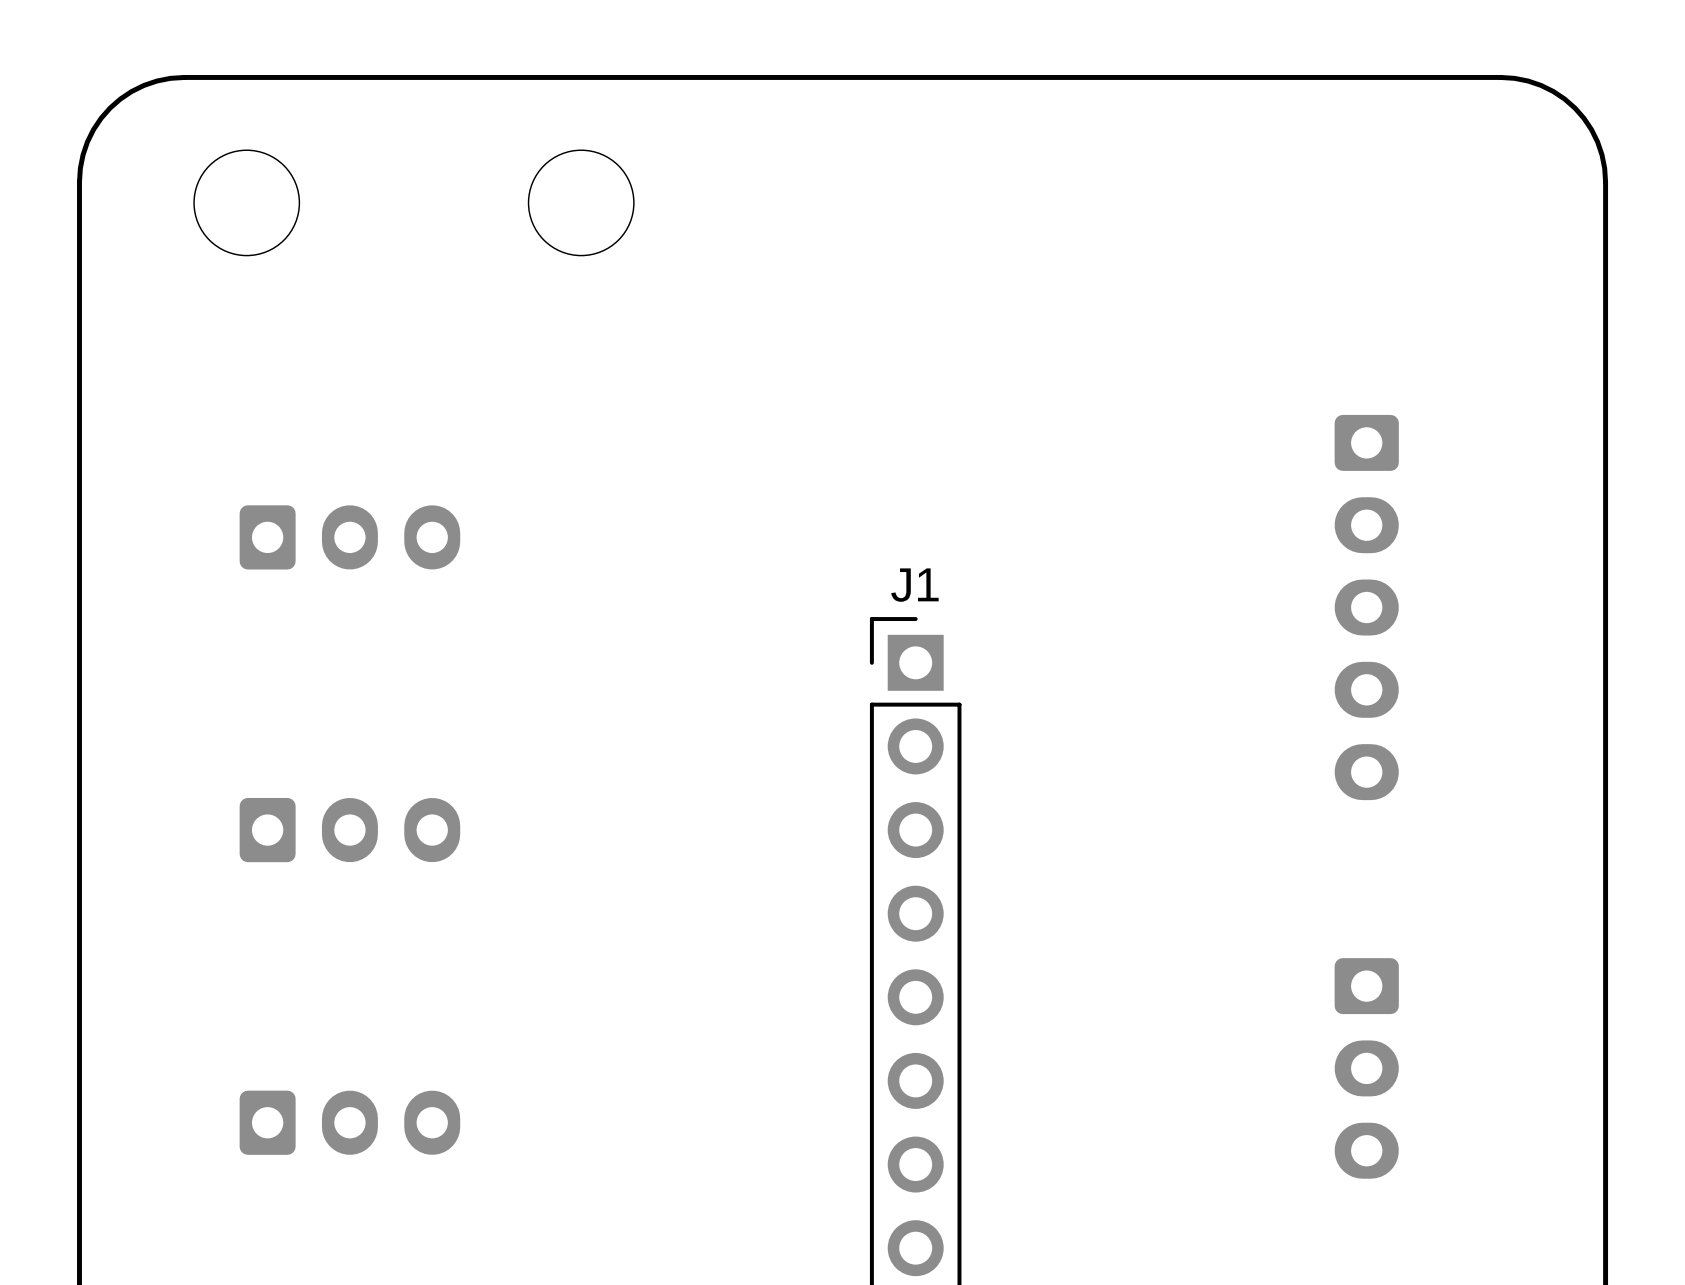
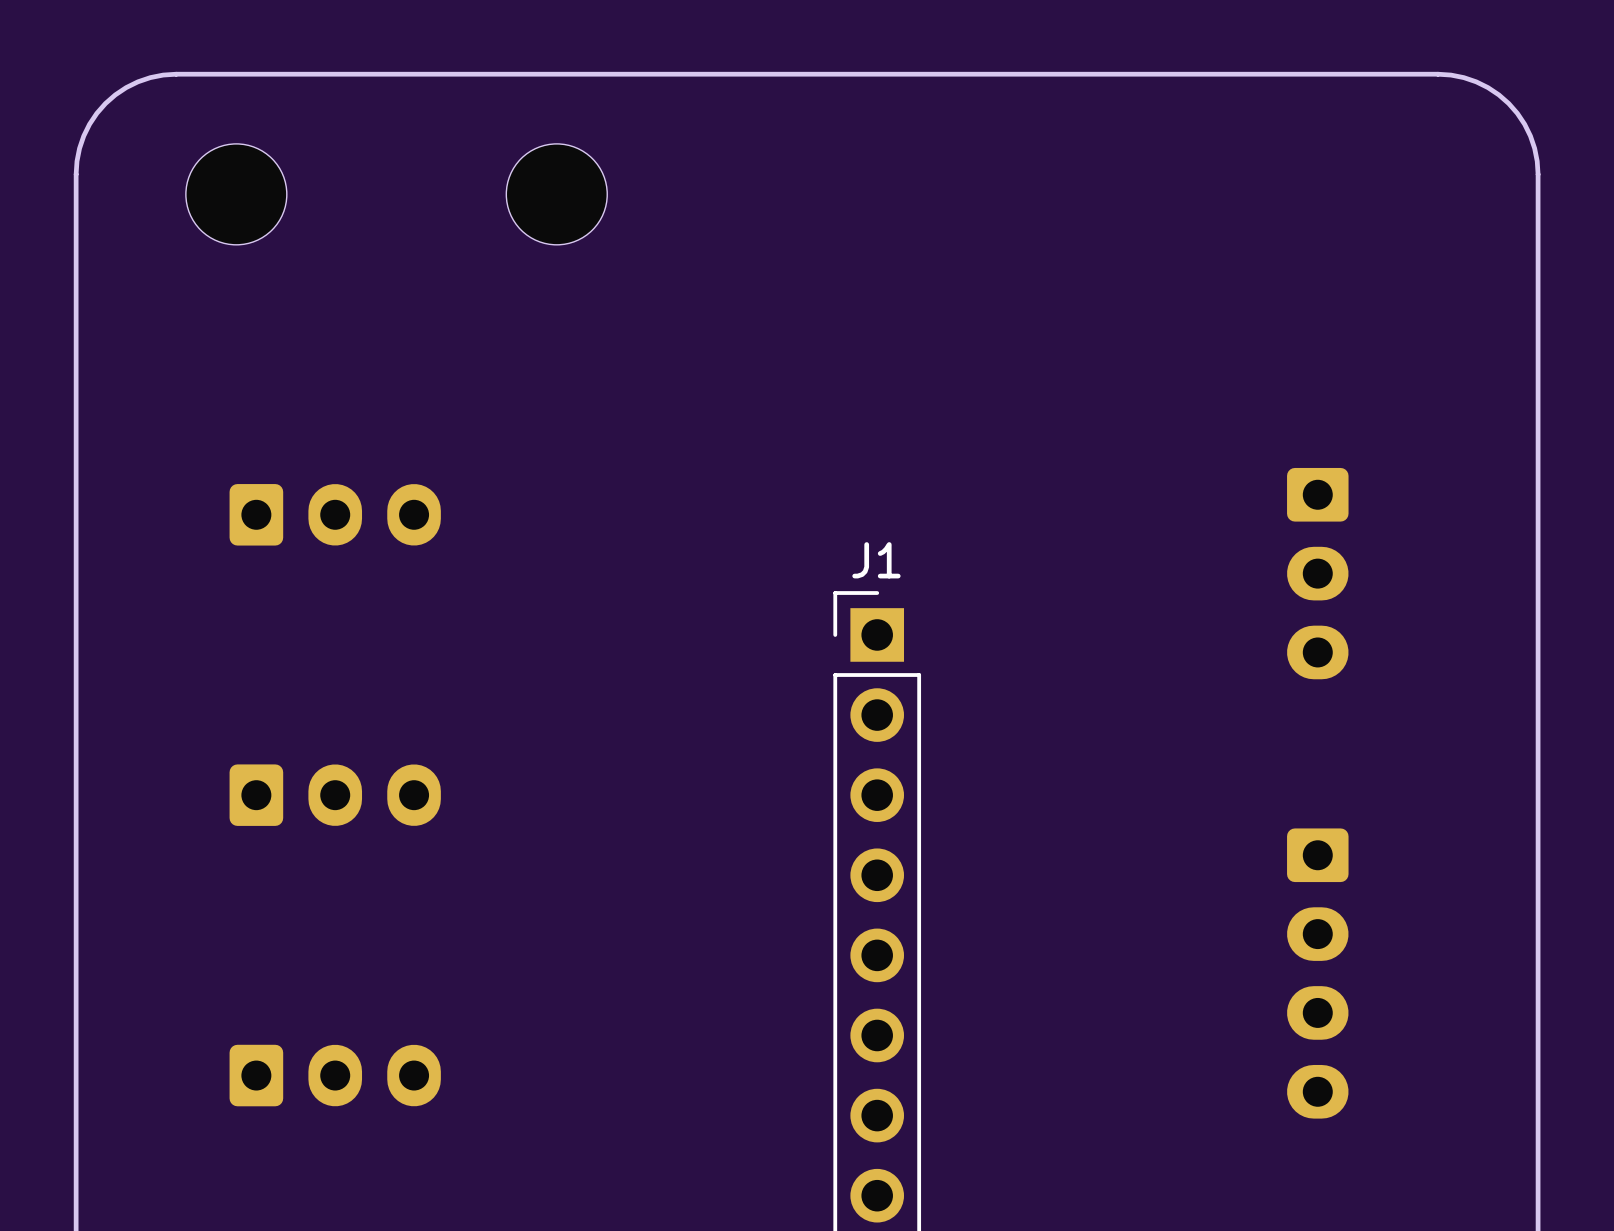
part footprint: [1334, 414, 1399, 801] -> [1287, 467, 1349, 680]
part: none -> (1317, 973)
part: (1366, 1068) -> none

